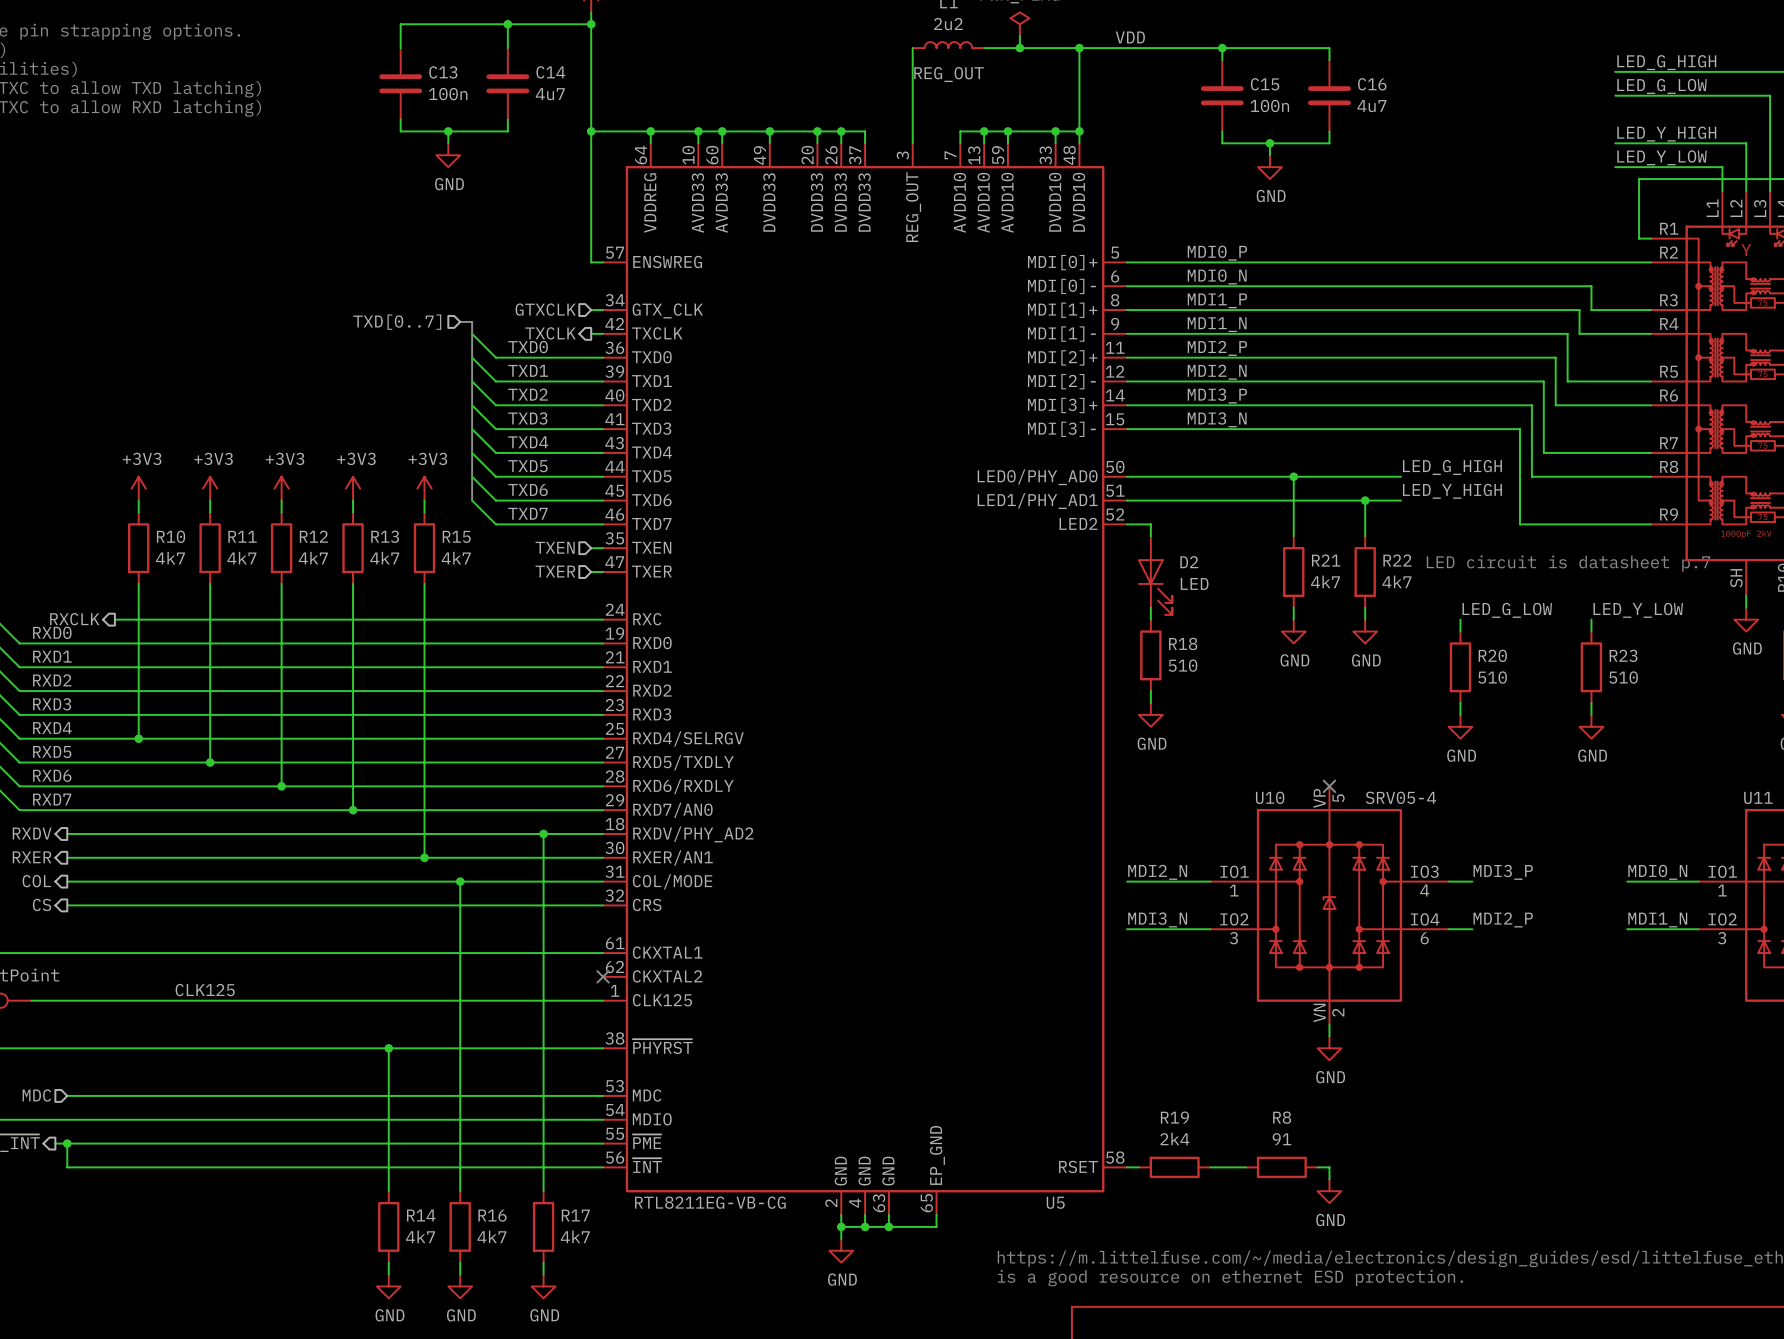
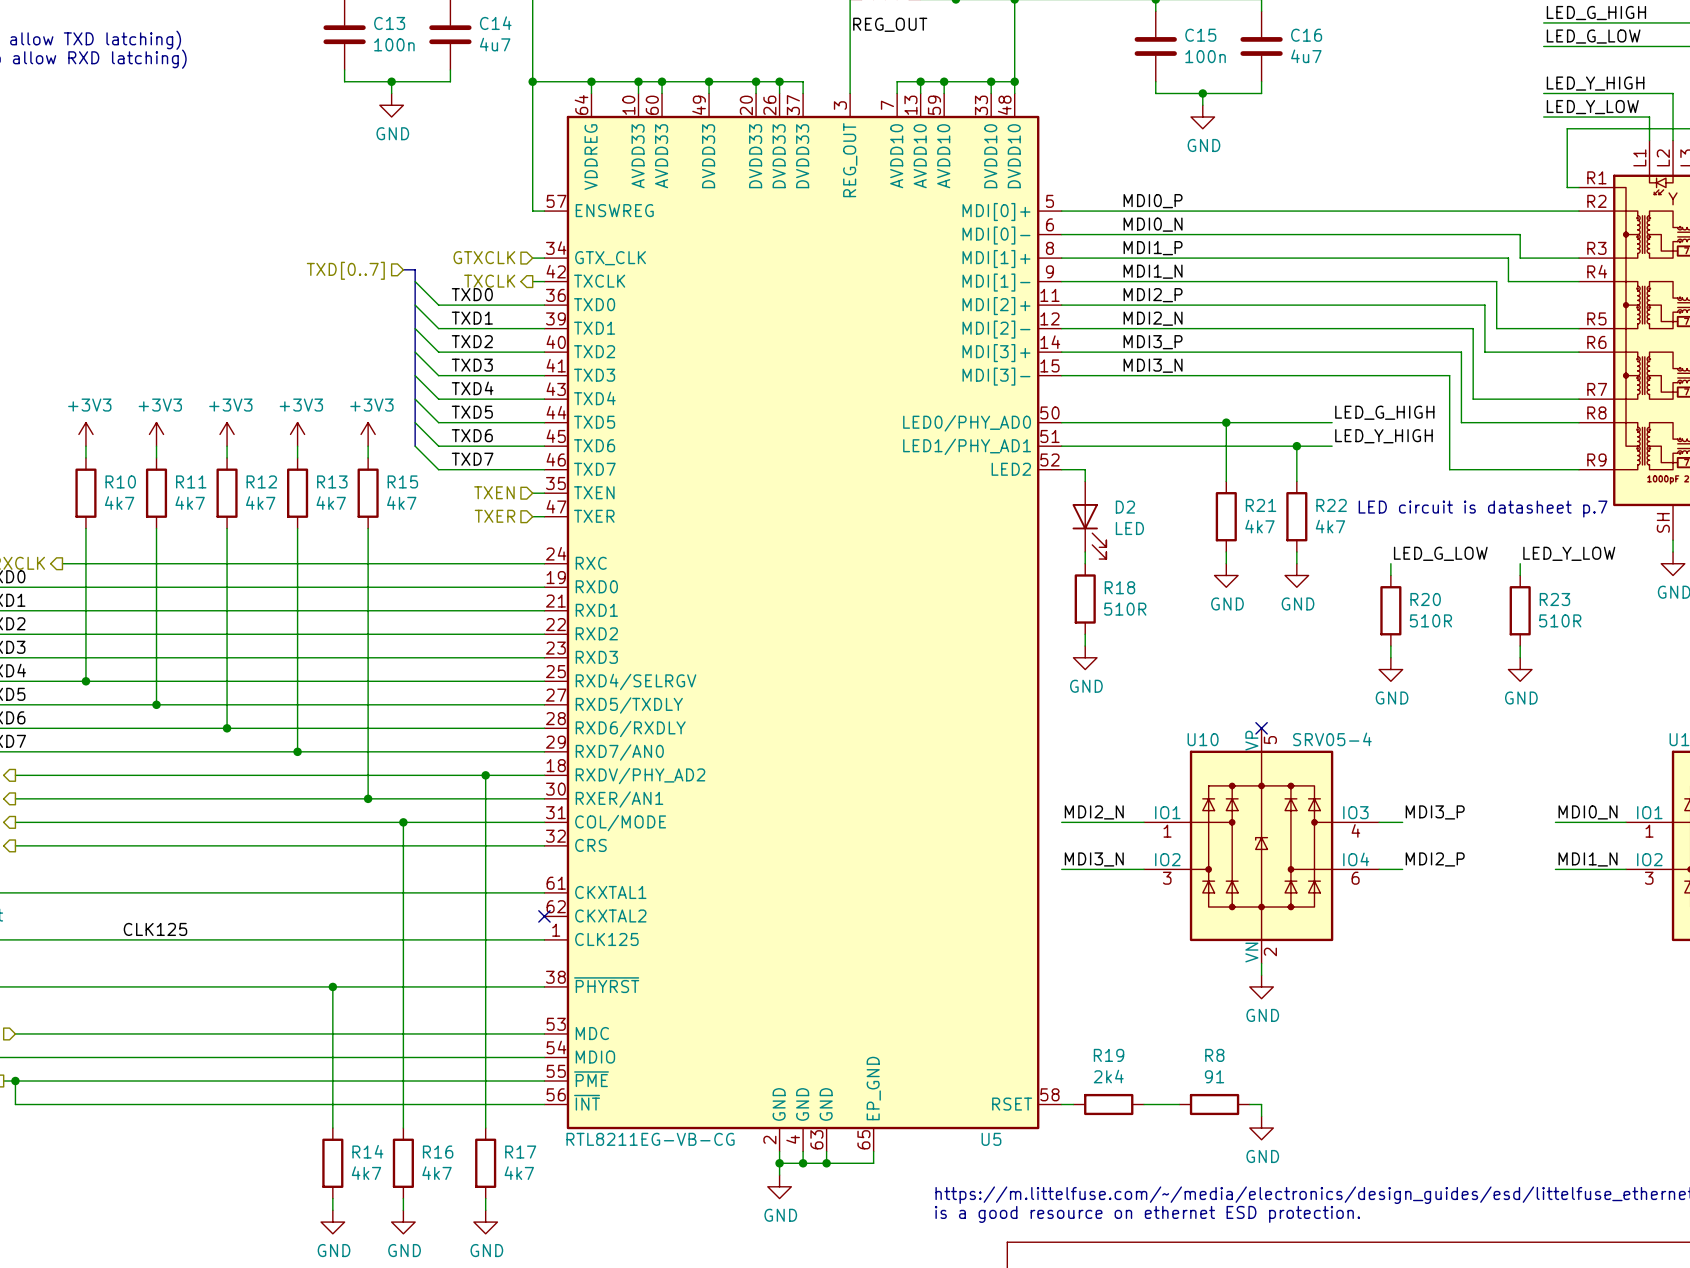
R18 value: 510 (1183, 665) -> 510R (1125, 609)
R20 value: 510 (1492, 677) -> 510R (1430, 620)
R23 value: 510 (1623, 677) -> 510R (1560, 620)

